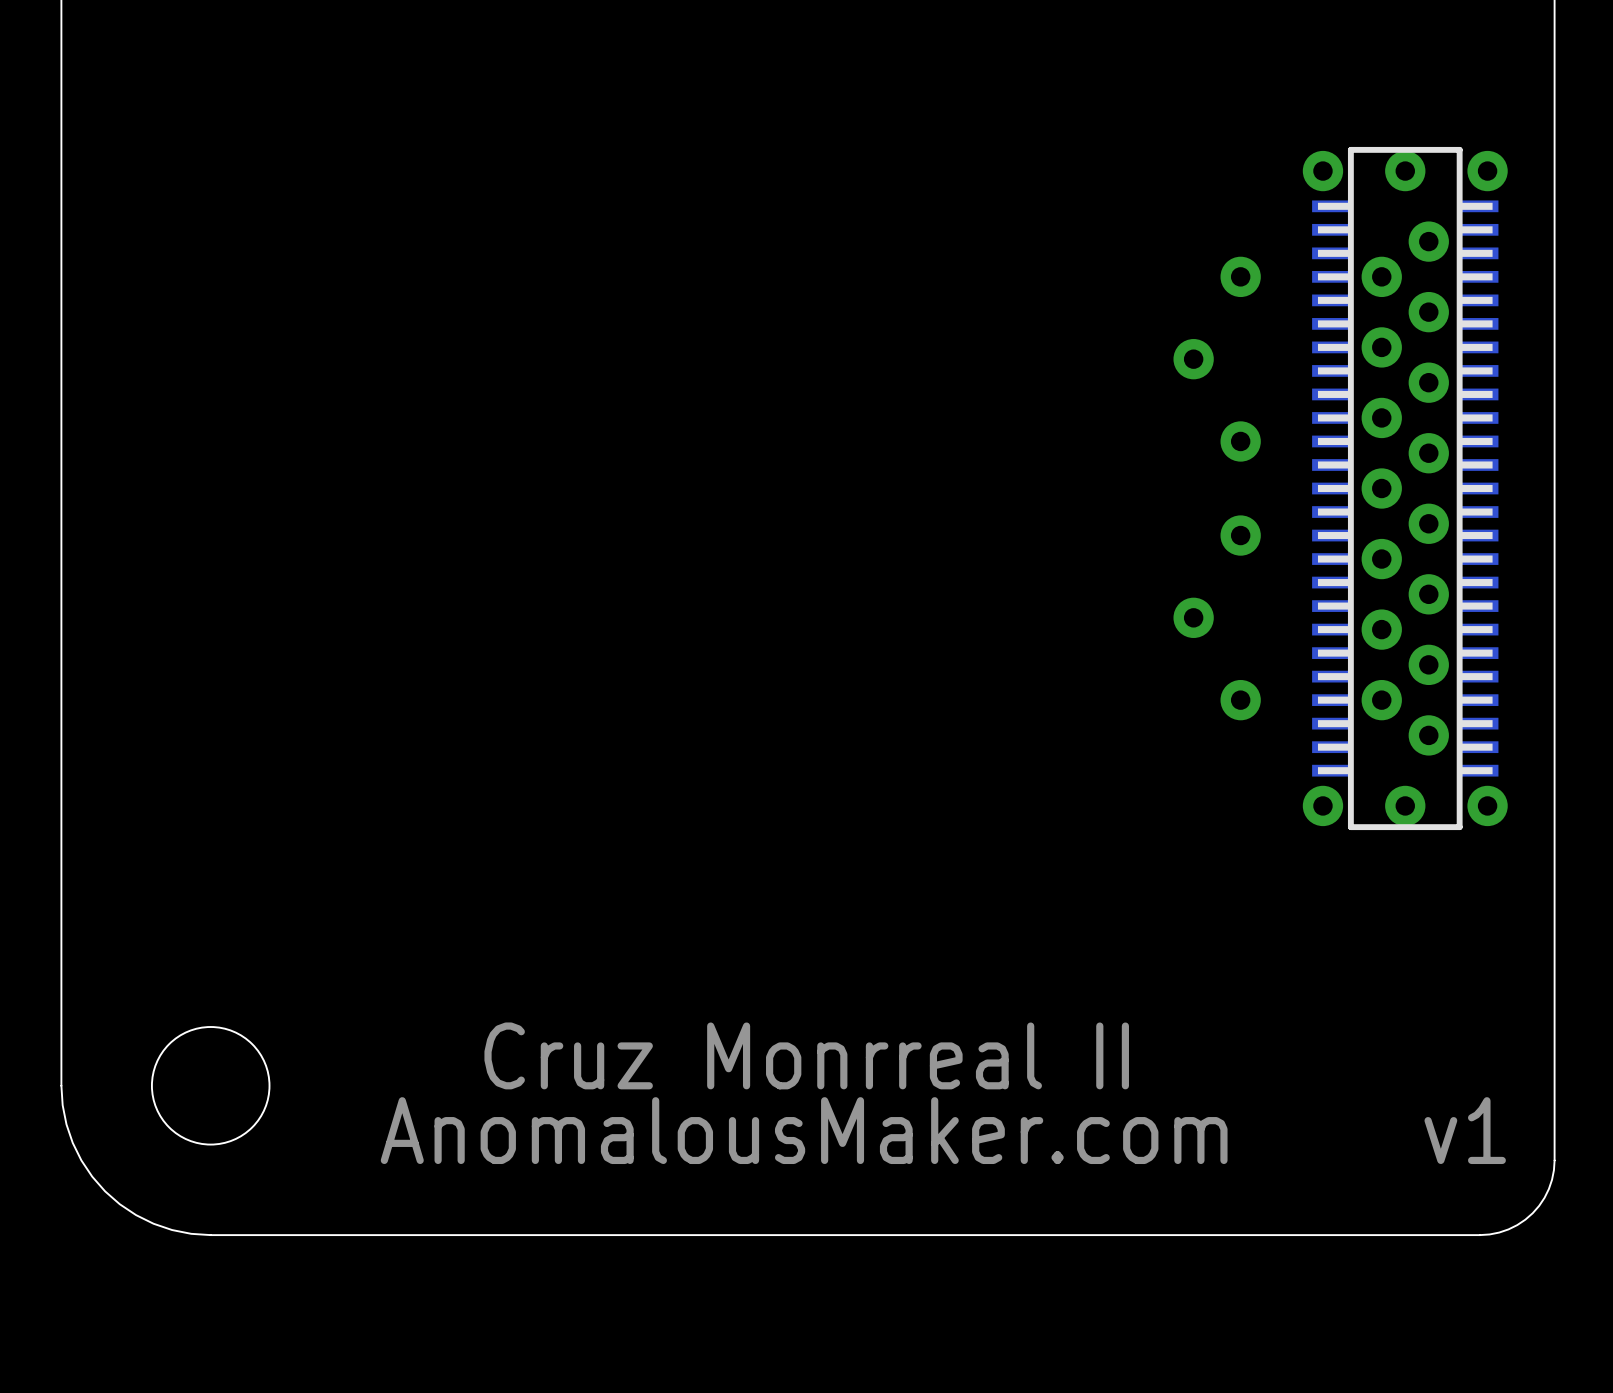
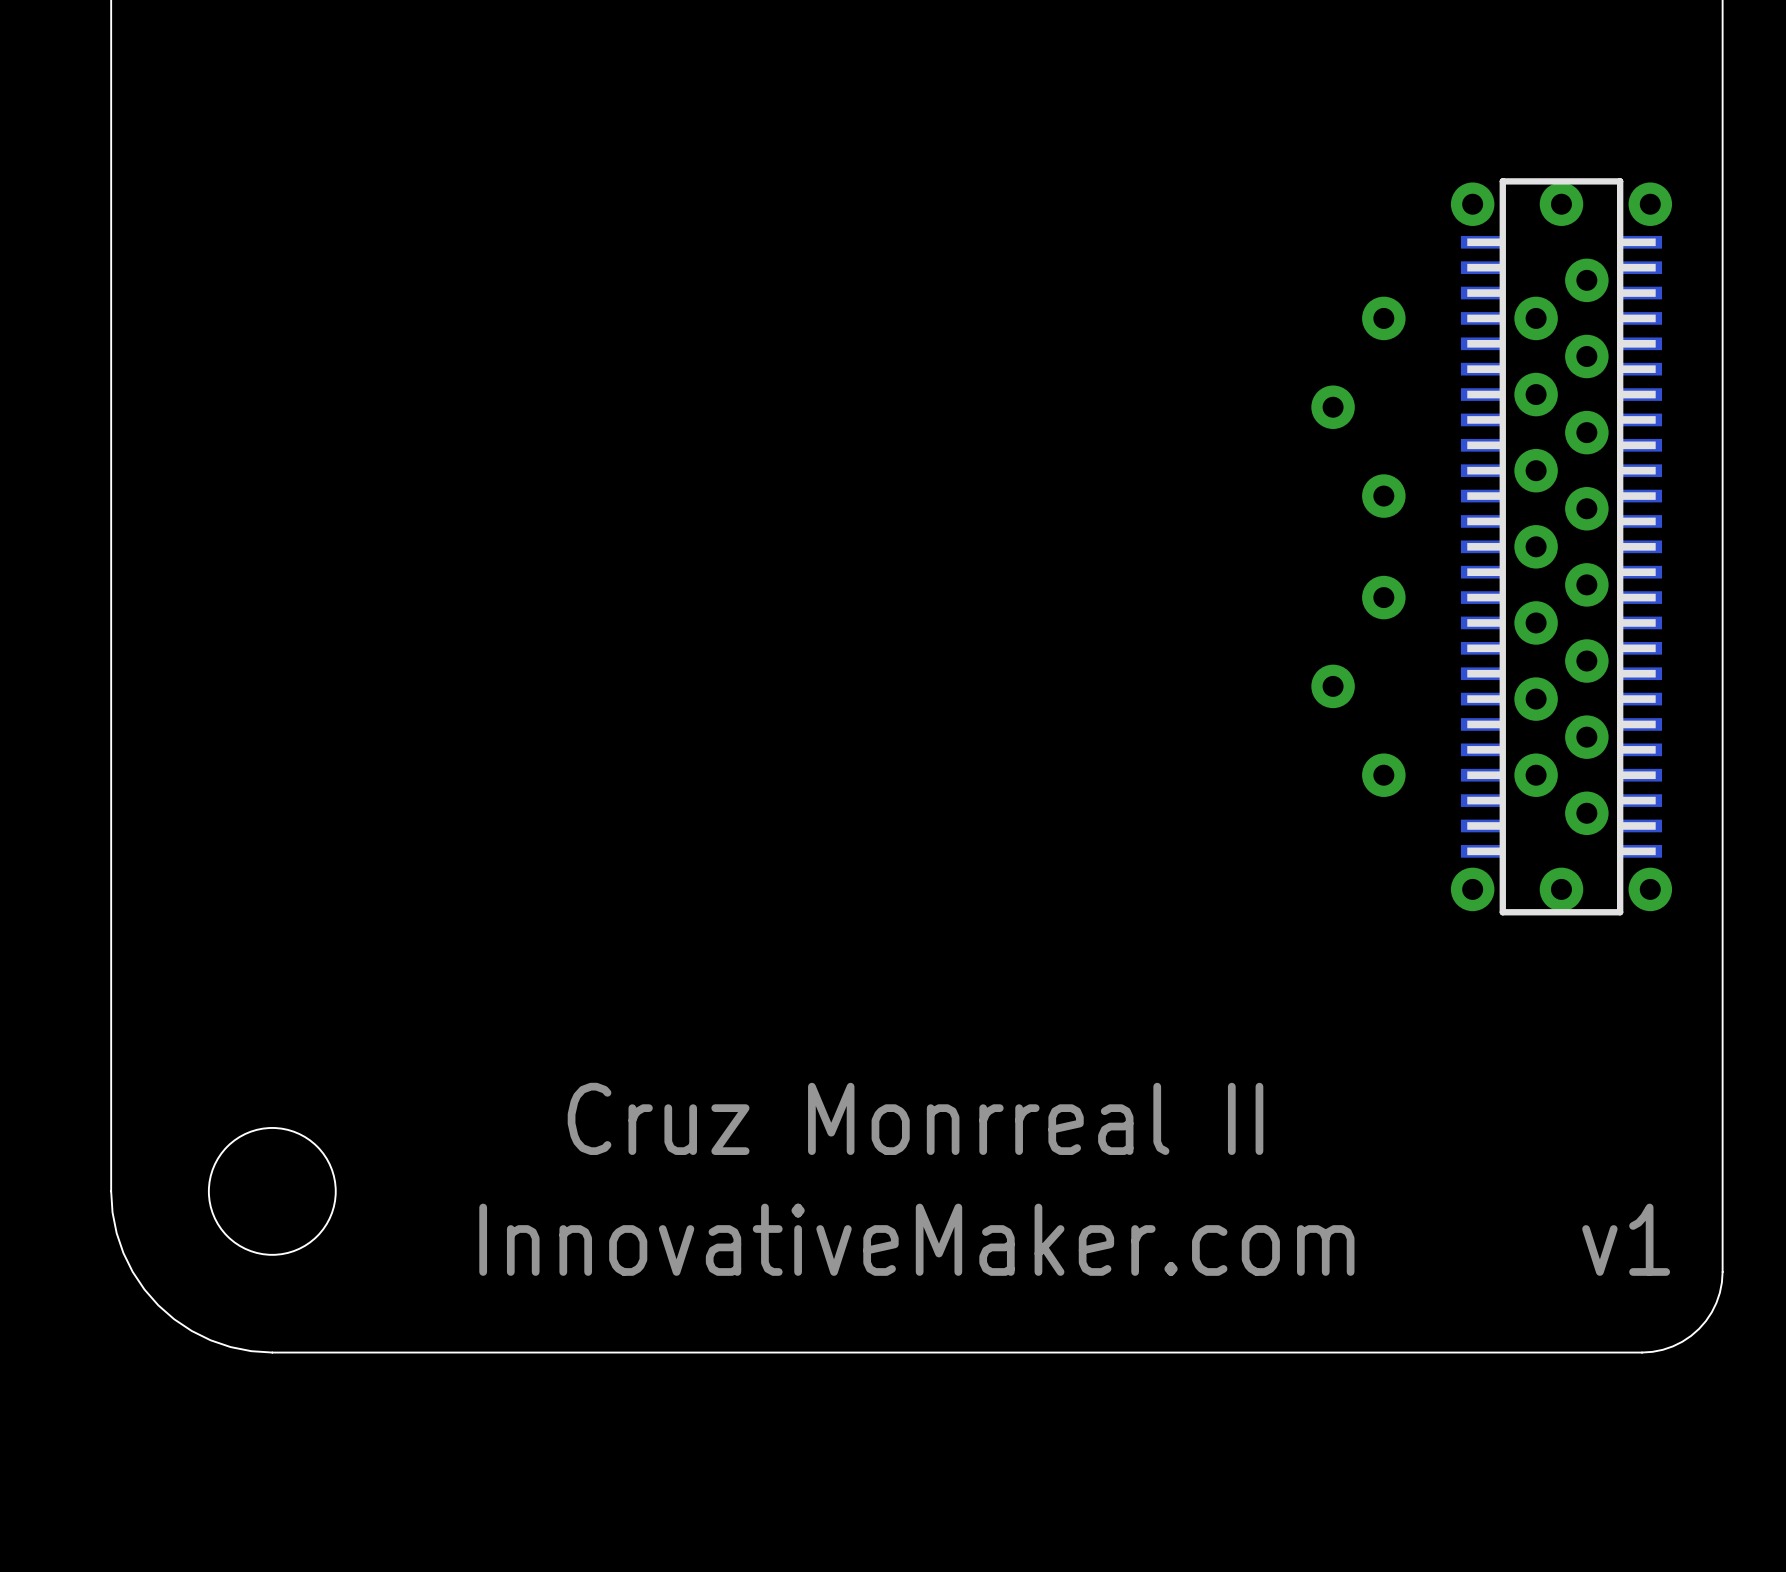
text position: Cruz Monrreal II (806, 1055) -> Cruz Monrreal II (915, 1118)
text: AnomalousMaker.com (804, 1130) -> InnovativeMaker.com (916, 1239)

